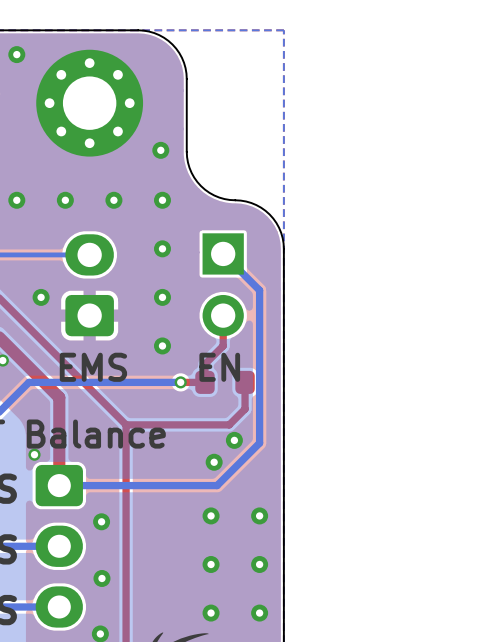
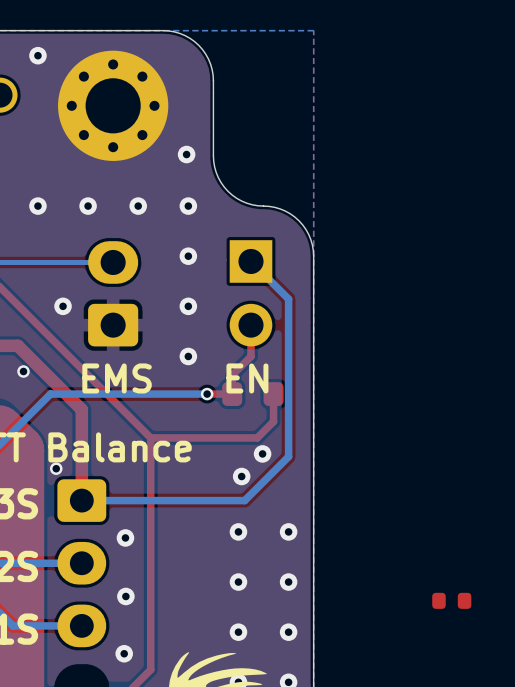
part: none -> (451, 600)

